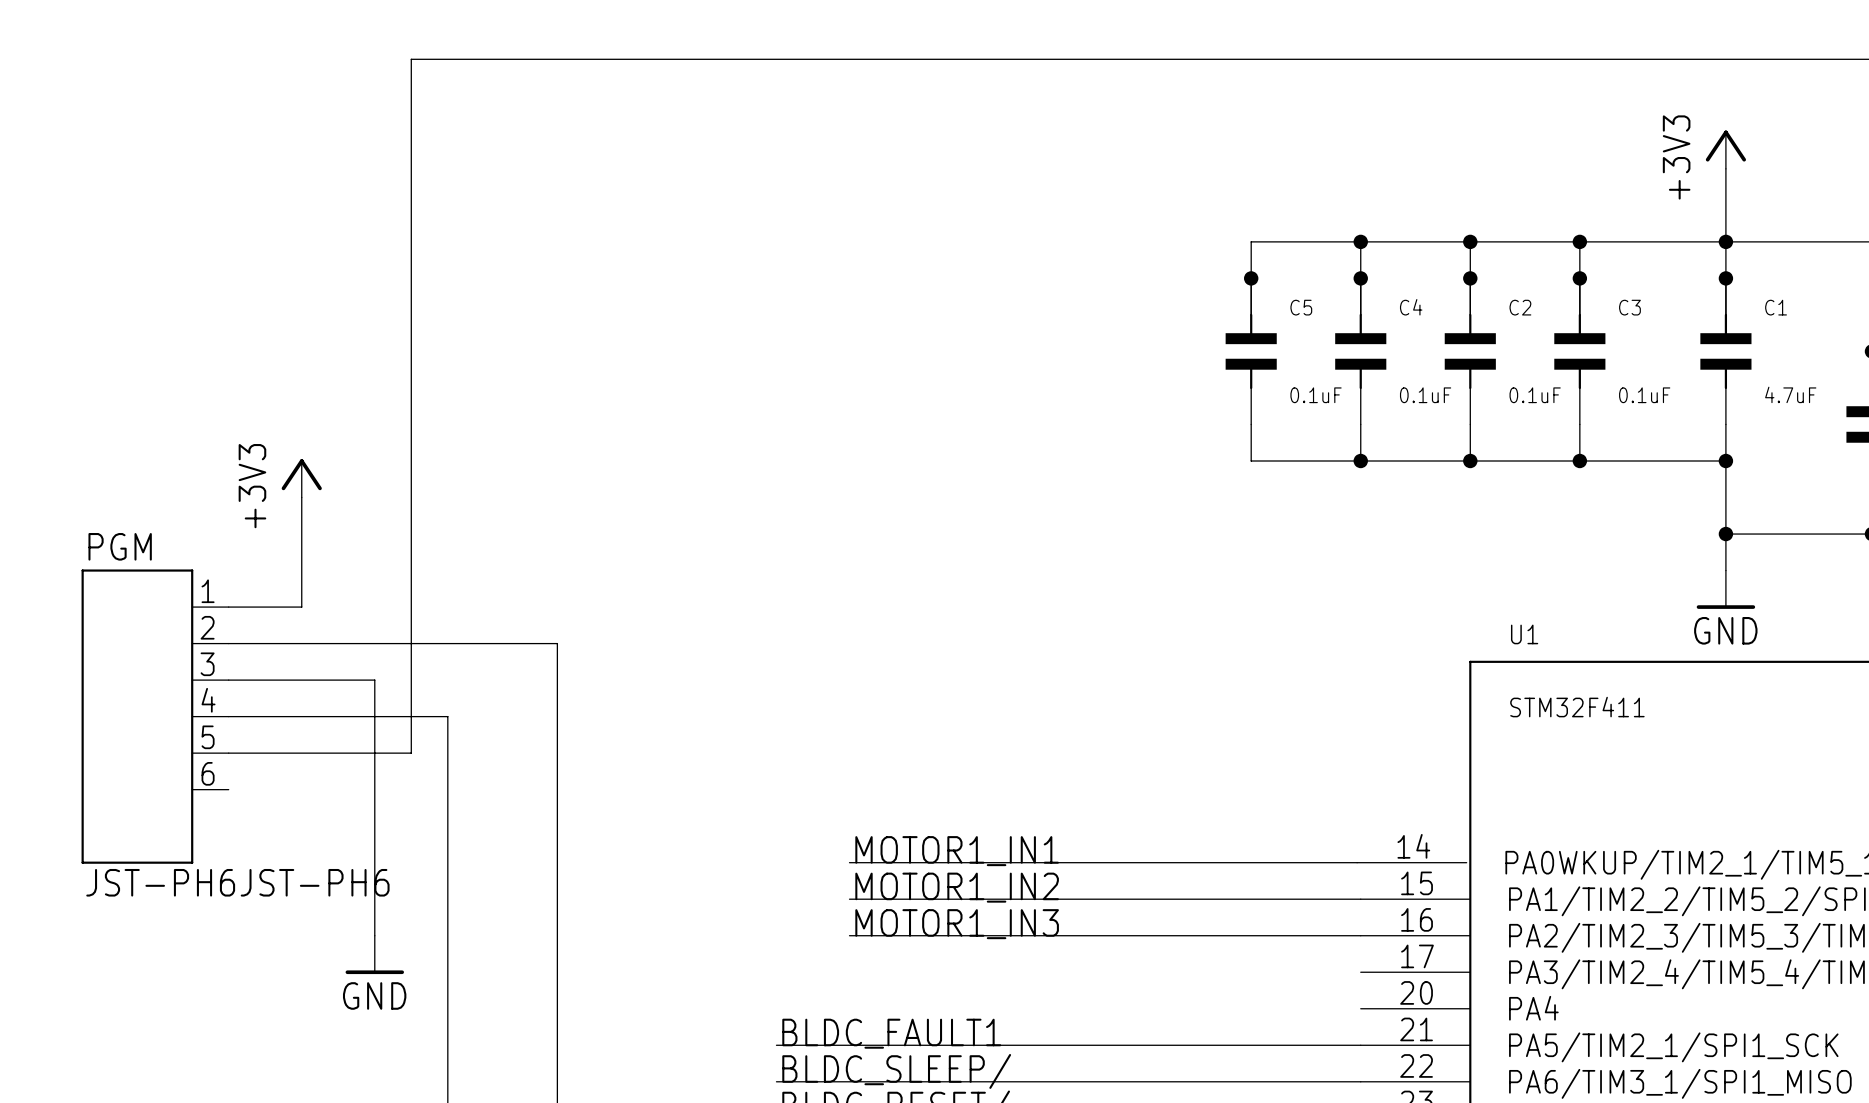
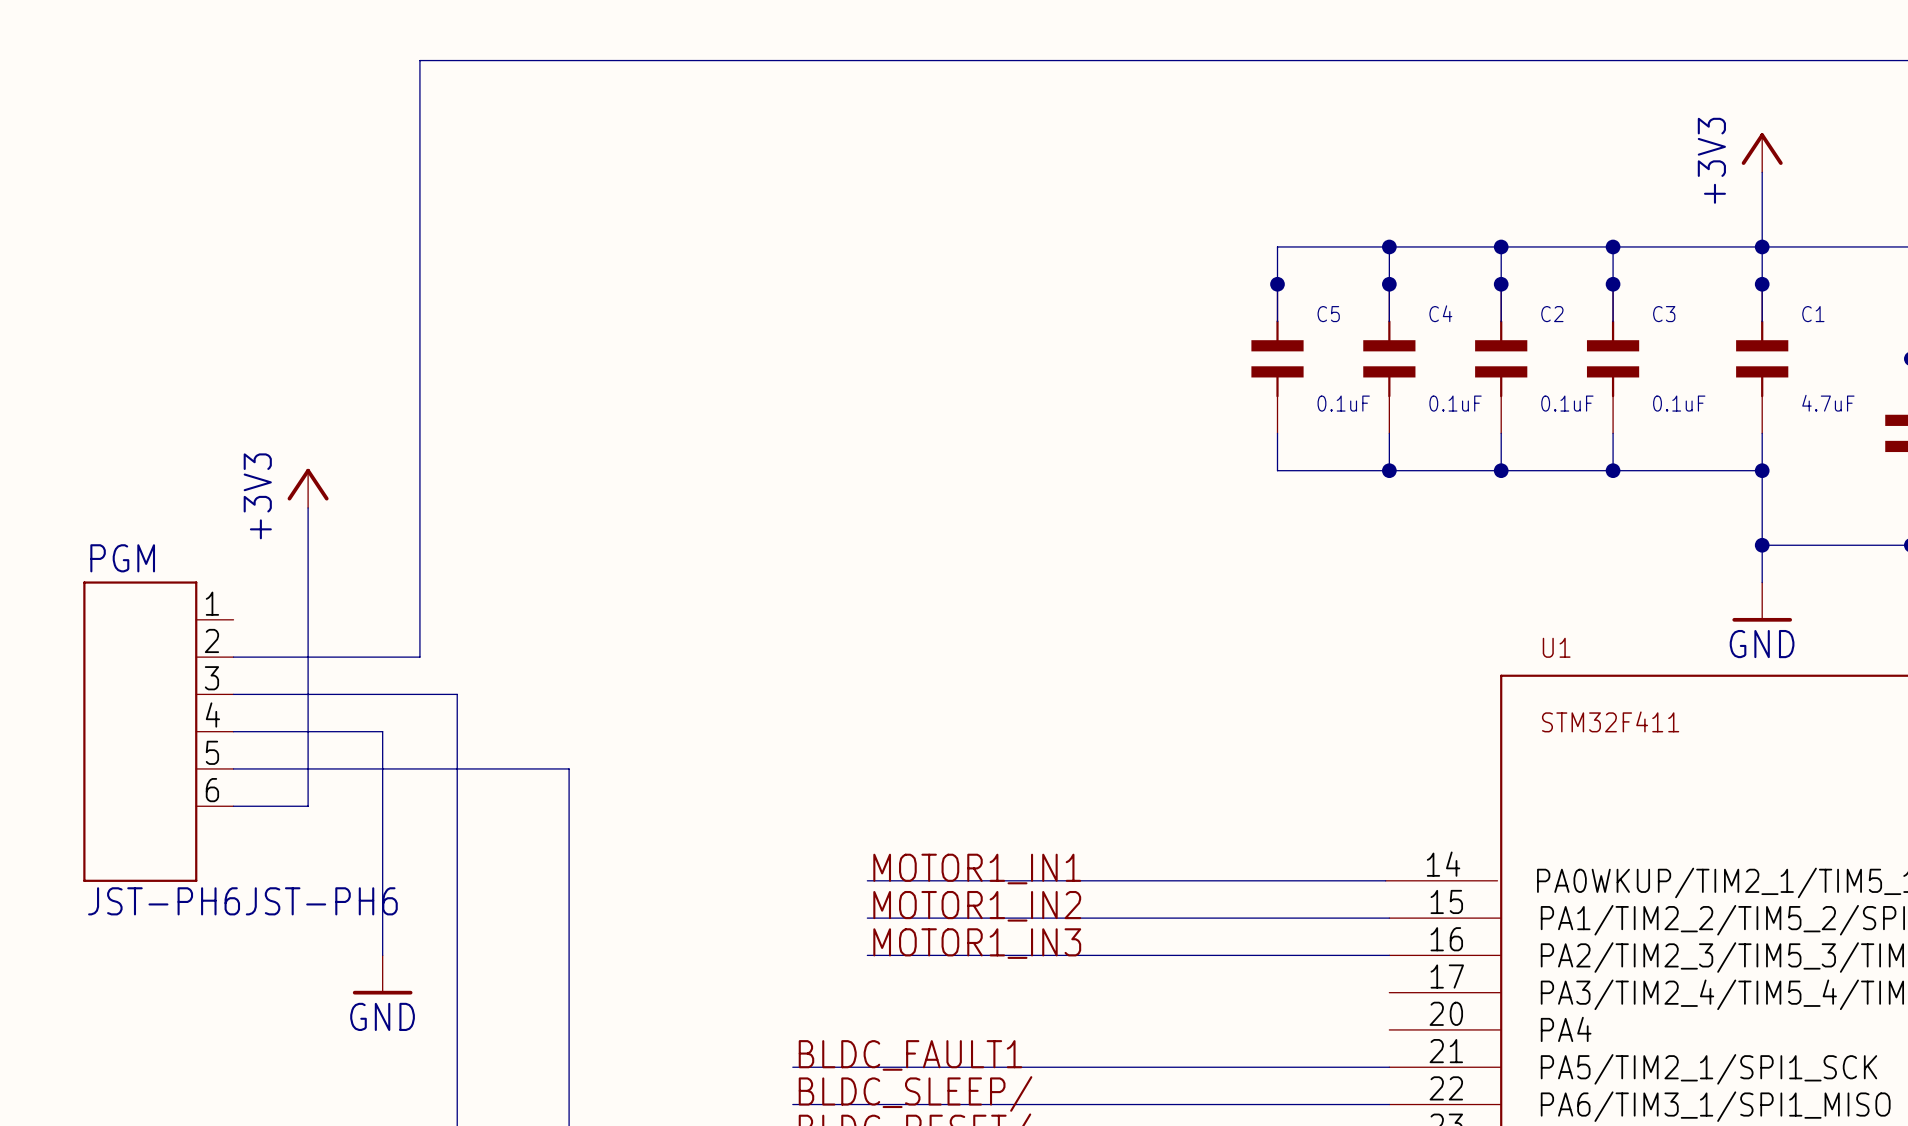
wire: (228, 607) (301, 607) -> (233, 806) (308, 806) (308, 619)
wire: (374, 680) (374, 716) (447, 716) -> (382, 694) (457, 694) (457, 731)
wire: (411, 753) (411, 643) (557, 643) (557, 753) -> (419, 768) (569, 768)

